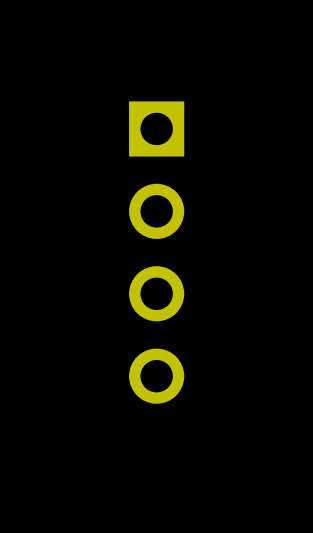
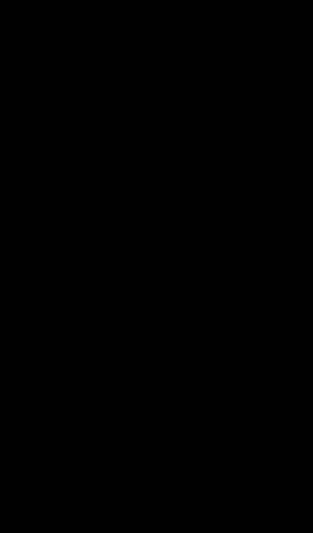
part: (156, 252) -> none

